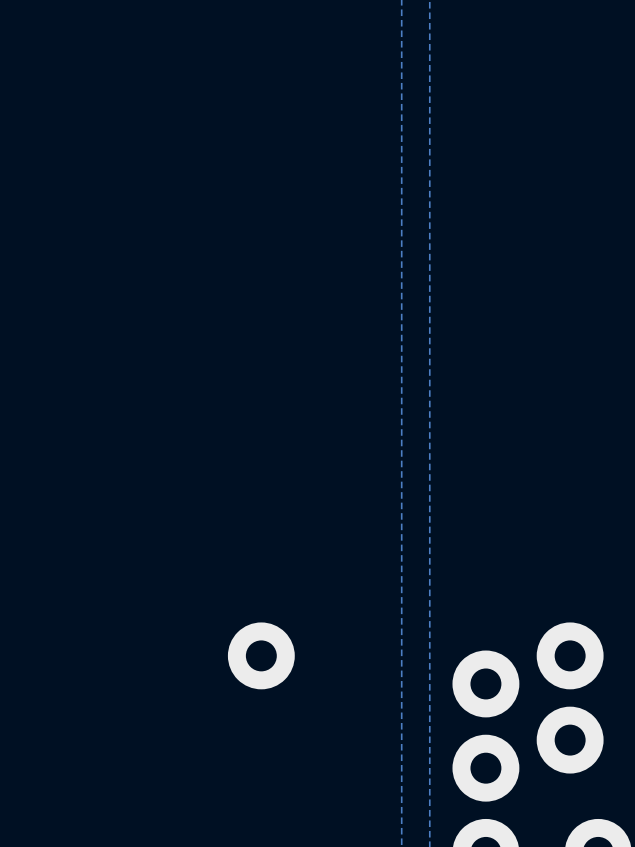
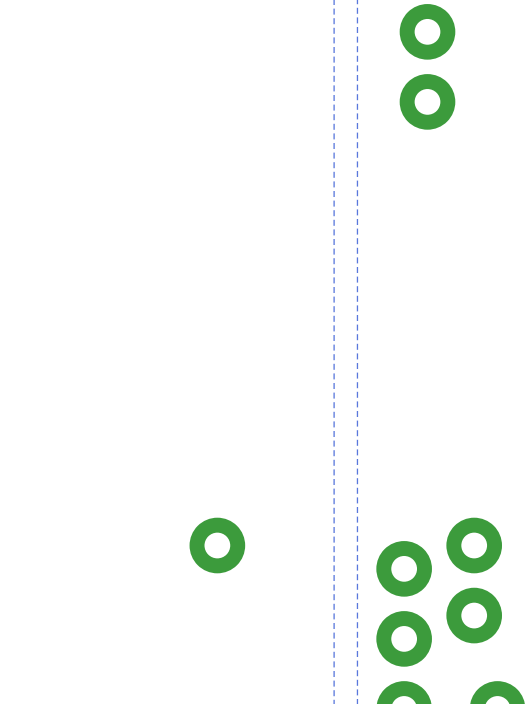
via: none -> (427, 31)
via: none -> (427, 101)

